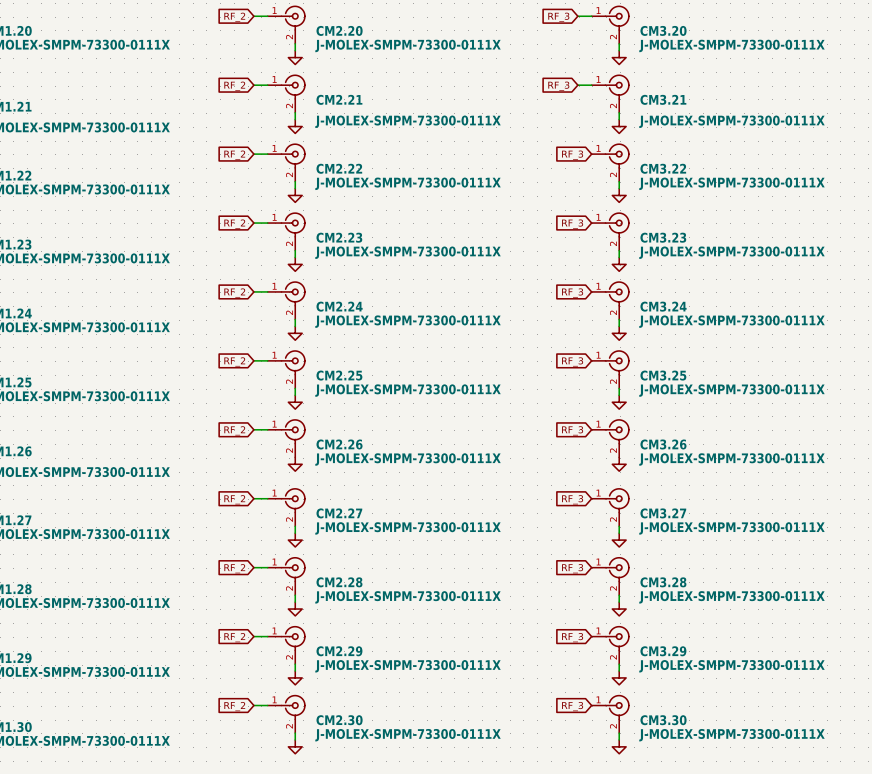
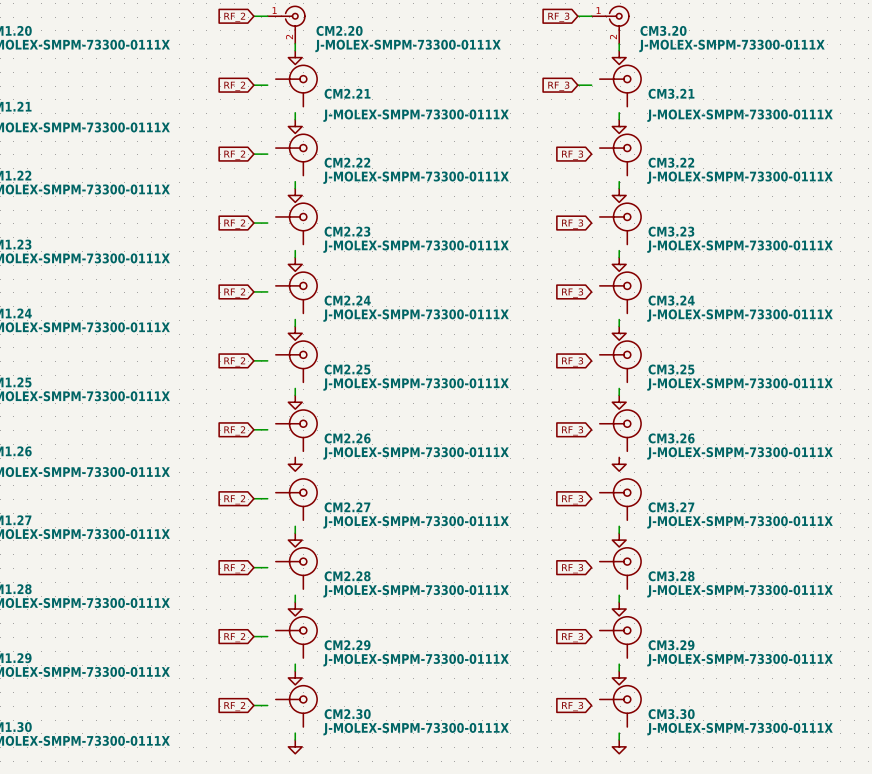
CM2.21 symbol: [267, 74, 306, 113] -> [275, 64, 318, 107]
CM3.21 symbol: [591, 74, 630, 113] -> [599, 64, 642, 107]
CM2.22 symbol: [267, 143, 306, 182] -> [275, 133, 318, 176]
CM3.22 symbol: [591, 143, 630, 182] -> [599, 133, 642, 176]
CM2.23 symbol: [267, 212, 306, 251] -> [275, 202, 318, 245]
CM3.23 symbol: [591, 212, 630, 251] -> [599, 202, 642, 245]
CM2.24 symbol: [267, 281, 306, 320] -> [275, 271, 318, 314]
CM3.24 symbol: [591, 281, 630, 320] -> [599, 271, 642, 314]
CM2.25 symbol: [267, 350, 306, 389] -> [275, 340, 318, 383]
CM3.25 symbol: [591, 350, 630, 389] -> [599, 340, 642, 383]
CM2.26 symbol: [267, 419, 306, 458] -> [275, 409, 318, 452]
CM3.26 symbol: [591, 419, 630, 458] -> [599, 409, 642, 452]
CM2.27 symbol: [267, 488, 306, 527] -> [275, 478, 318, 521]
CM3.27 symbol: [591, 488, 630, 527] -> [599, 478, 642, 521]
CM2.28 symbol: [267, 557, 306, 596] -> [275, 547, 318, 590]
CM3.28 symbol: [591, 557, 630, 596] -> [599, 547, 642, 590]
CM2.29 symbol: [267, 625, 306, 665] -> [275, 616, 318, 659]
CM3.29 symbol: [591, 625, 630, 665] -> [599, 616, 642, 659]
CM2.30 symbol: [267, 694, 306, 734] -> [275, 684, 318, 728]
CM3.30 symbol: [591, 694, 630, 734] -> [599, 684, 642, 728]

